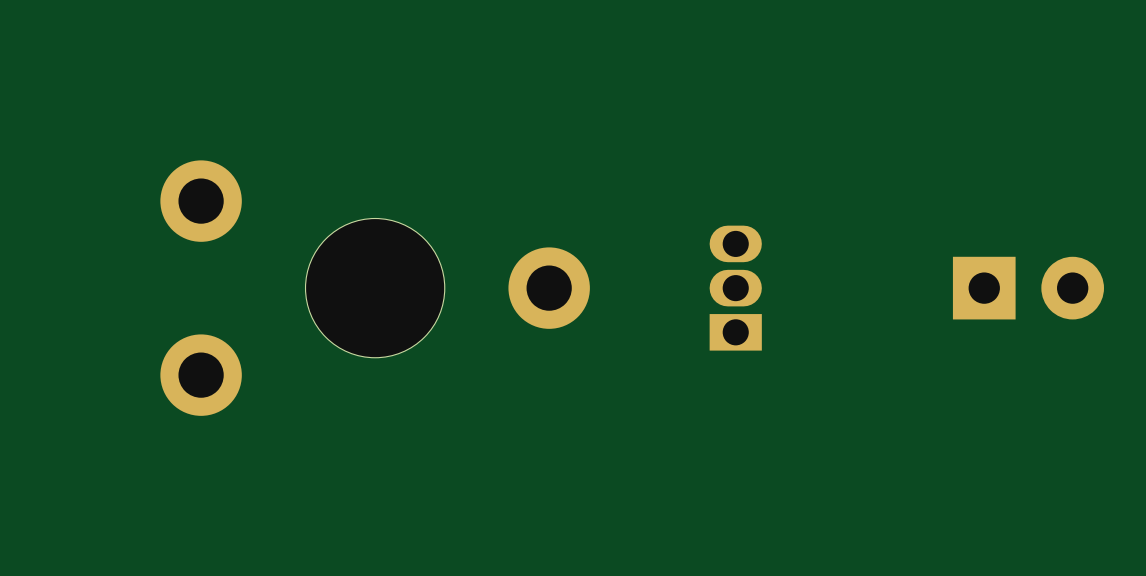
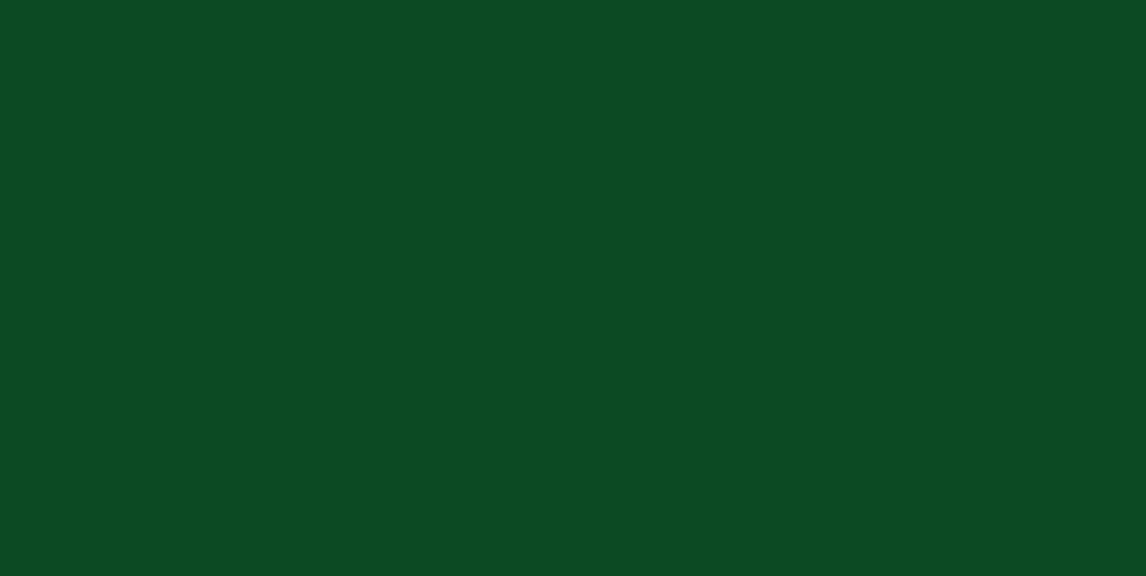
part: (375, 288) -> none
part: (735, 288) -> none
part: (1028, 288) -> none

